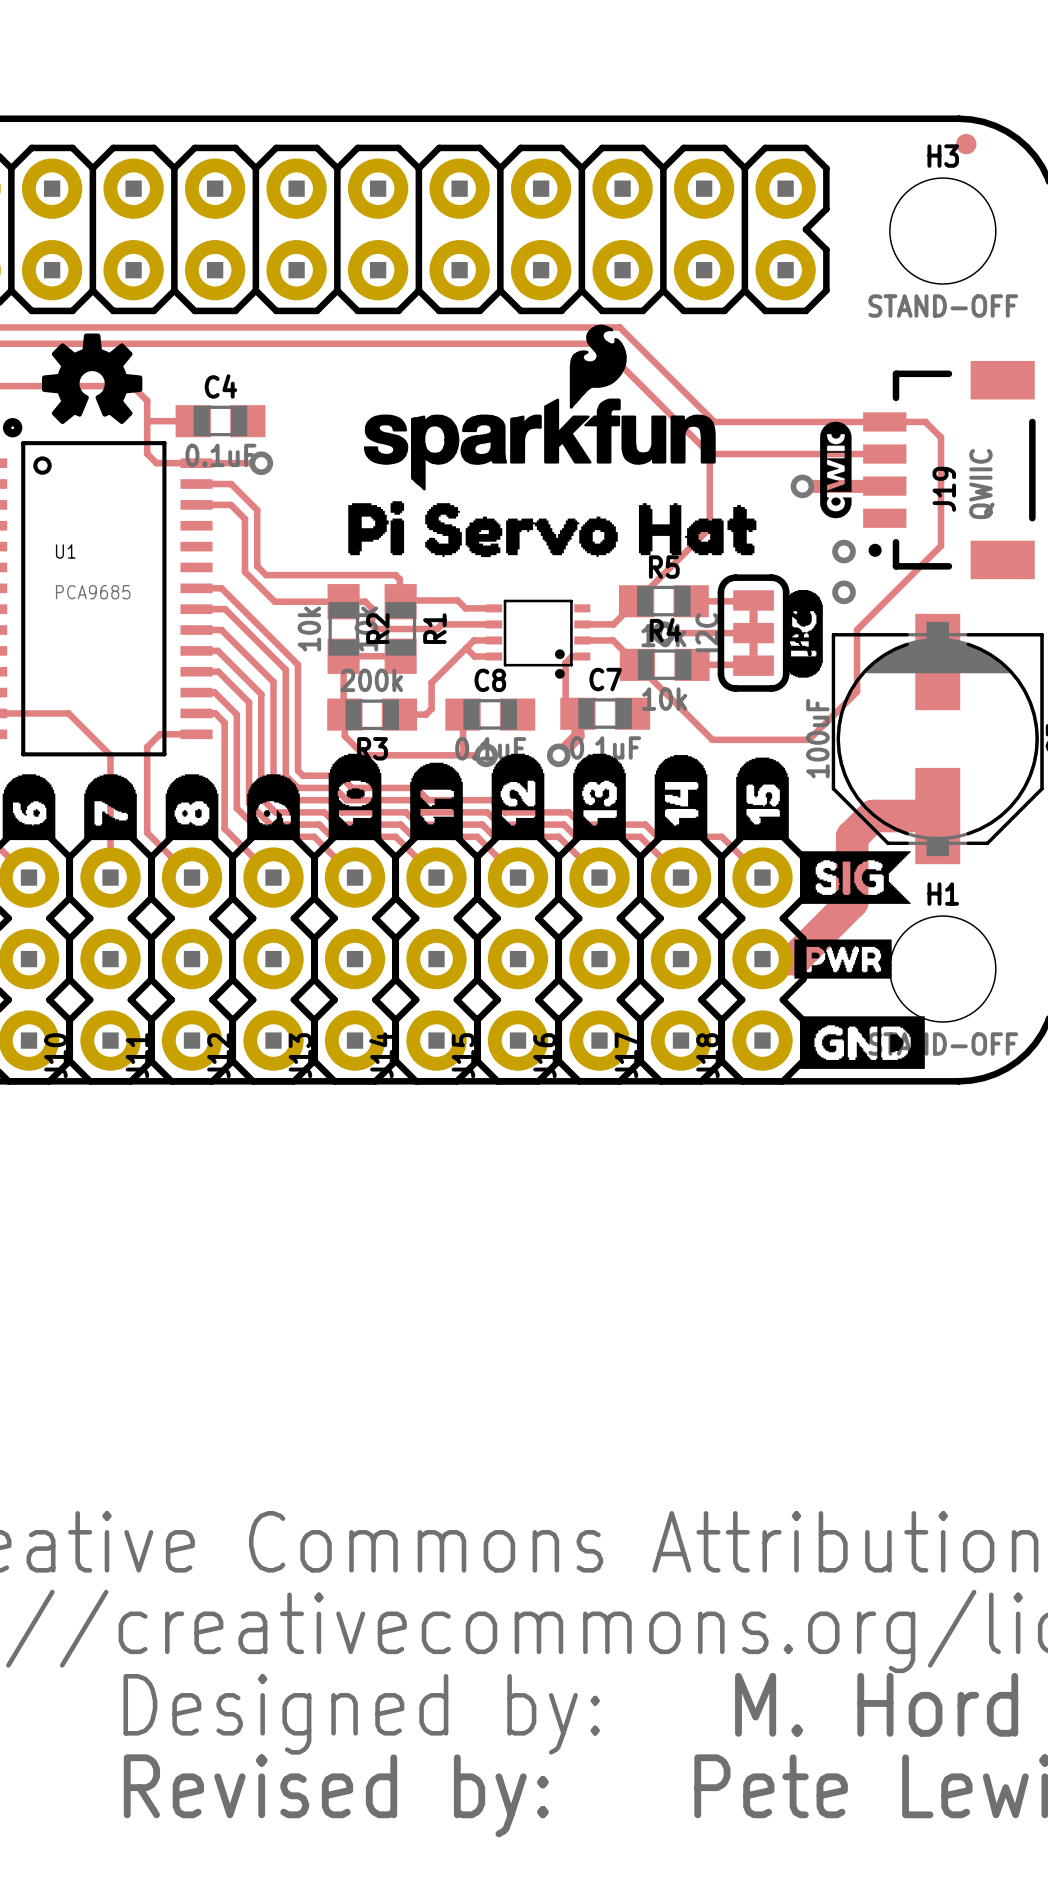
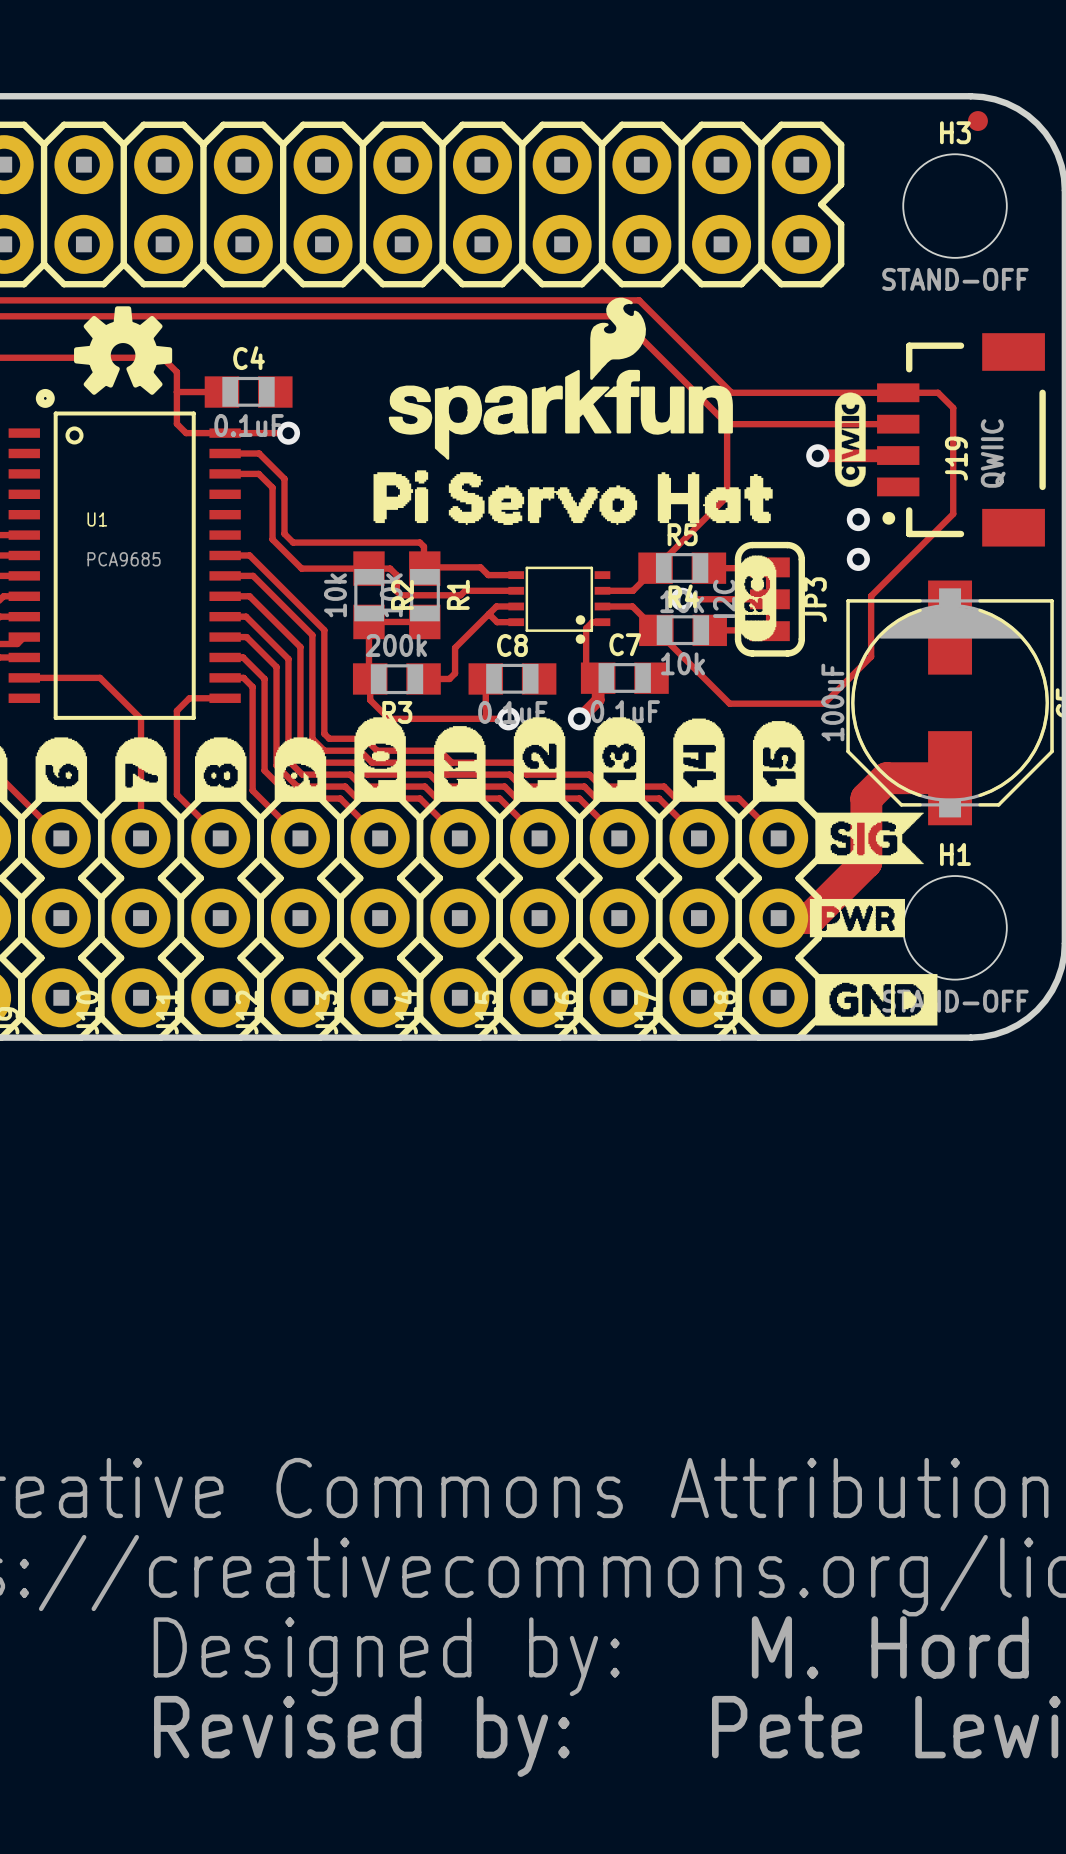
drawing position: (803, 633) -> (757, 598)

